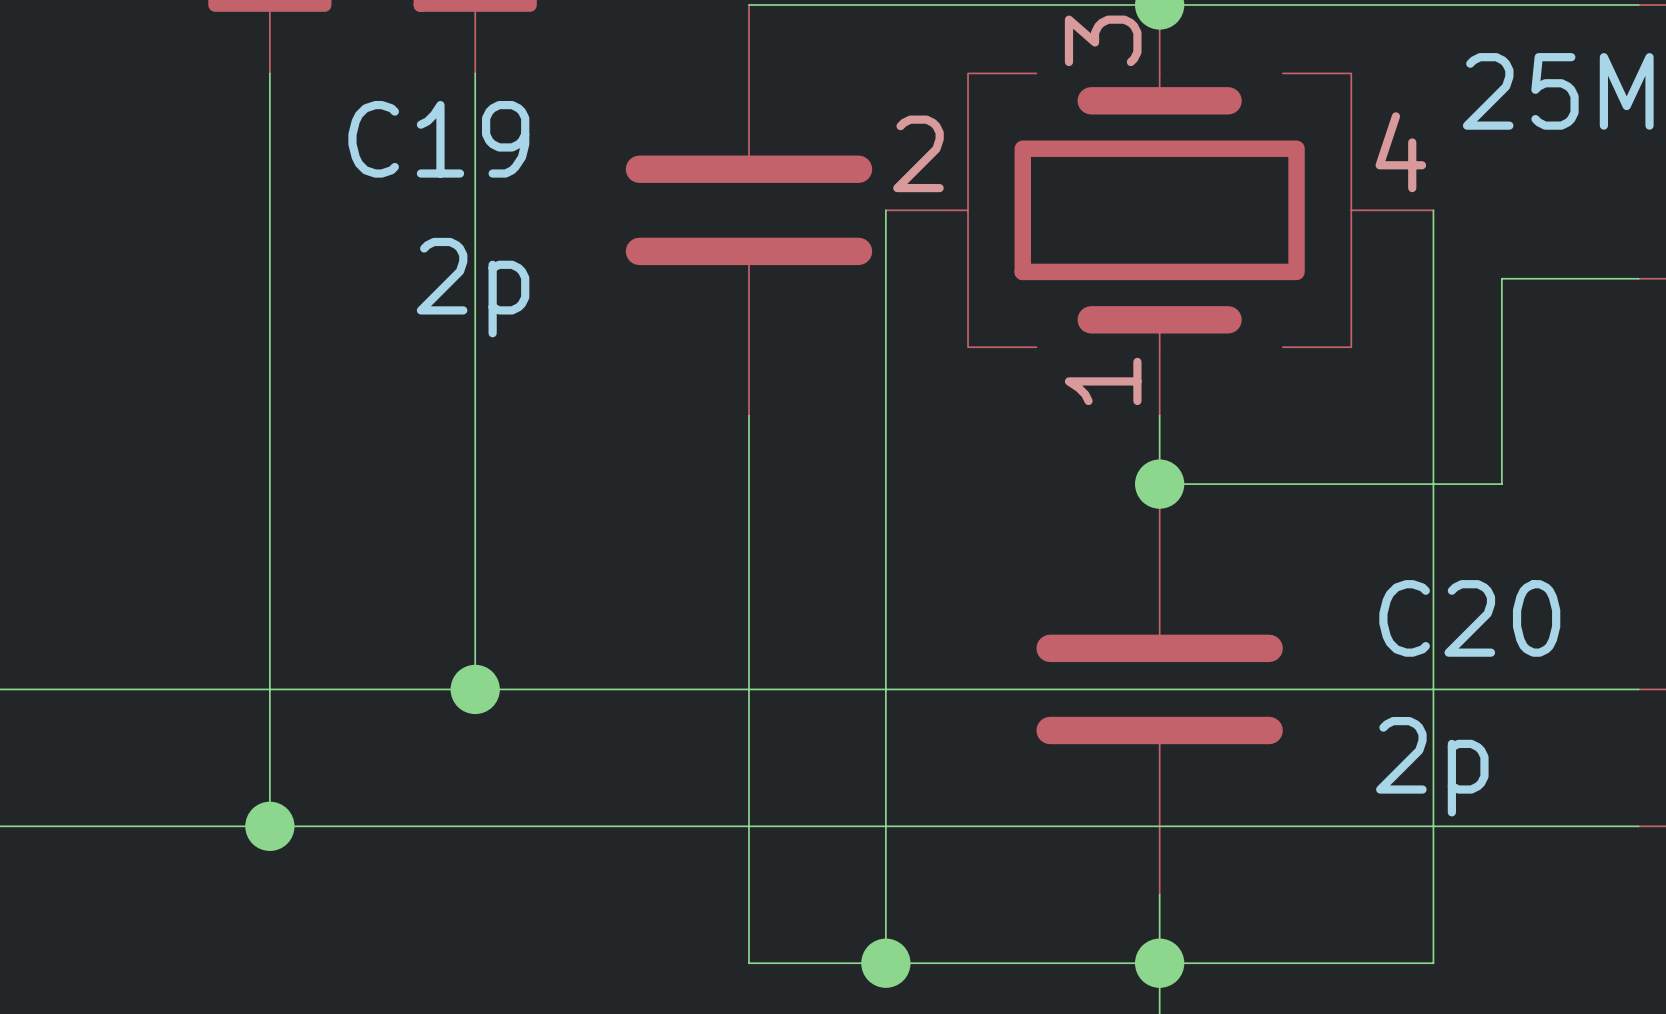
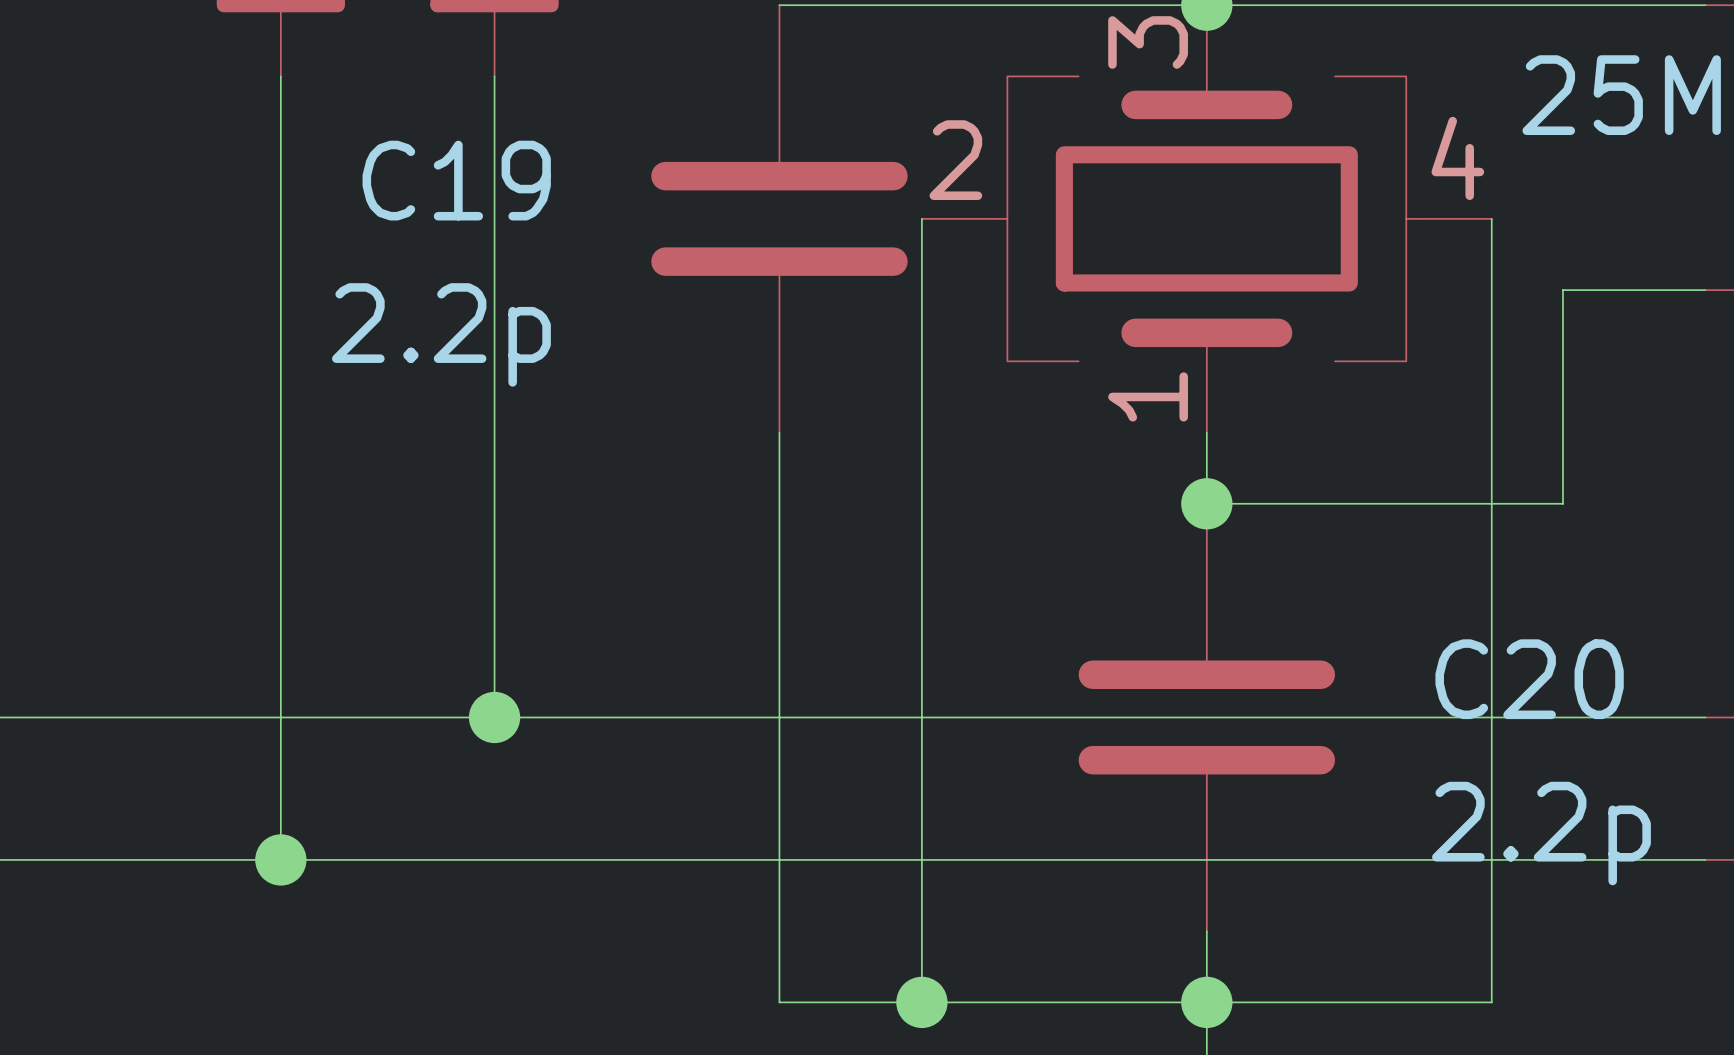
C19 name position: C19 (438, 139) -> C19 (456, 180)
C19 value: 2p (473, 287) -> 2.2p (441, 334)
C20 name position: C20 (1469, 618) -> C20 (1529, 679)
C20 value: 2p (1432, 766) -> 2.2p (1541, 833)

